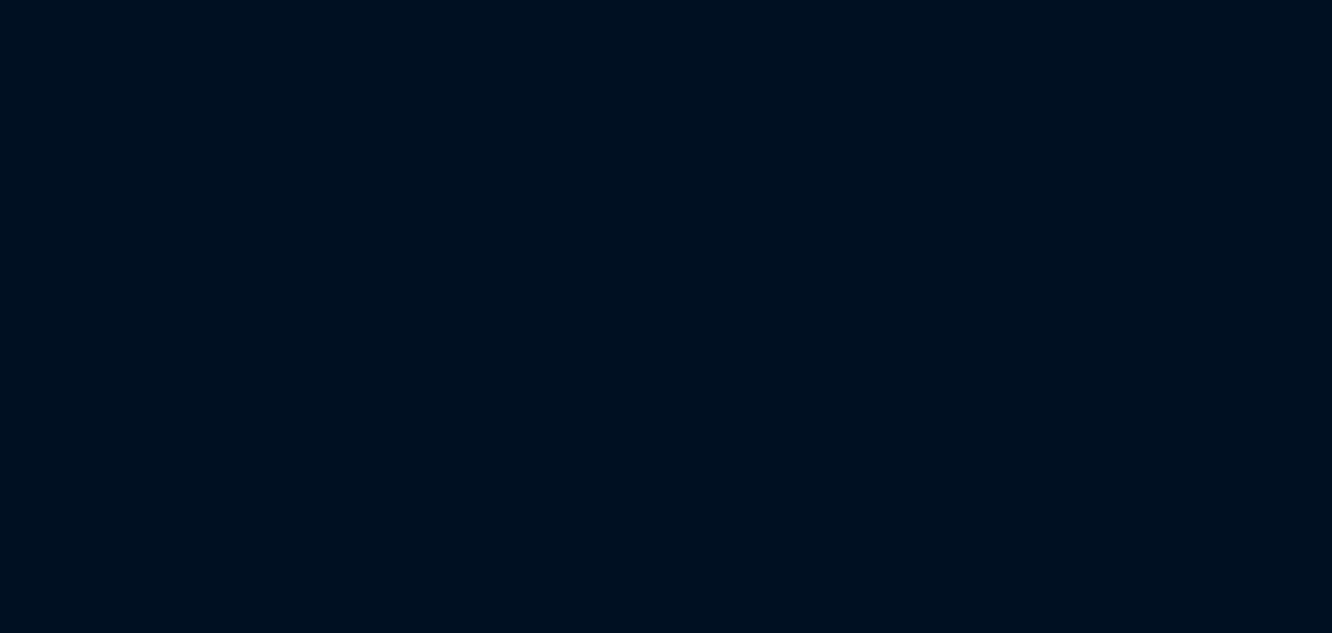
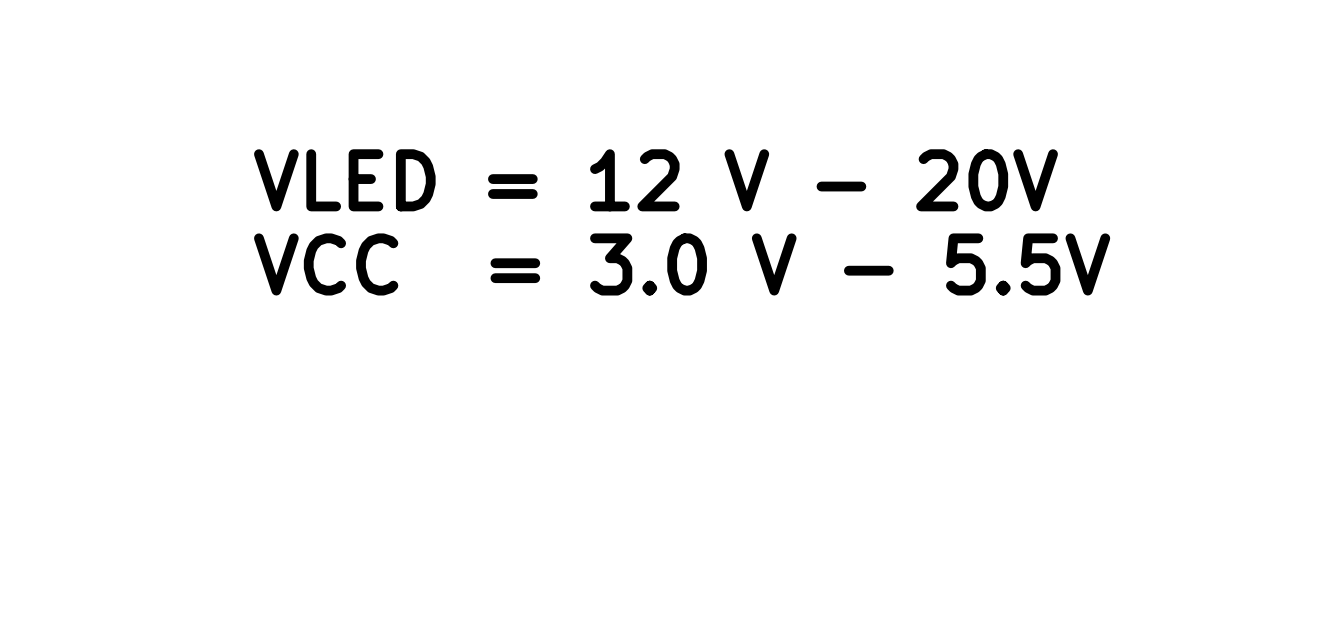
text: none -> VLED = 12 V - 20V (655, 180)
text: none -> VCC = 3.0 V - 5.5V (682, 264)

